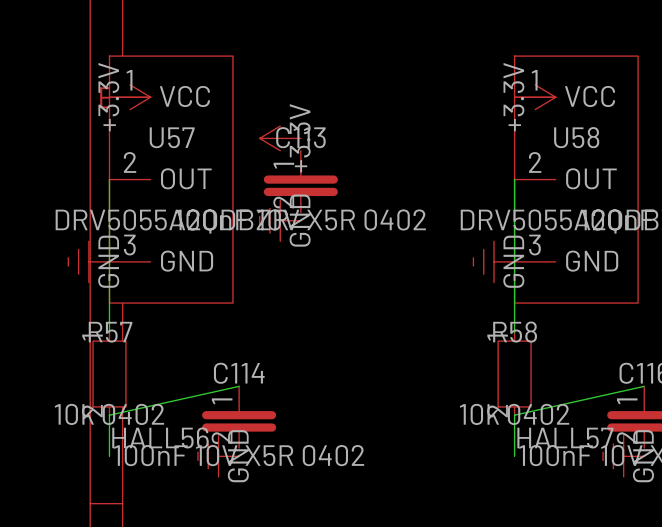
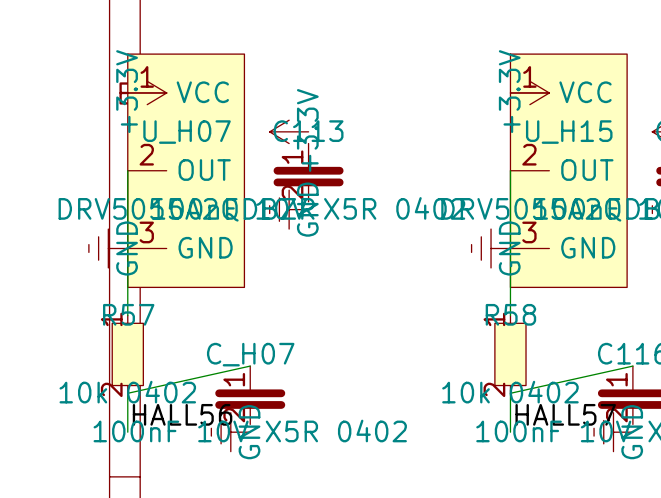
U57 name: U57 (172, 137) -> U_H07 (187, 132)
U58 name: U58 (576, 137) -> U_H15 (569, 132)
C114 name: C114 (239, 373) -> C_H07 (250, 354)

